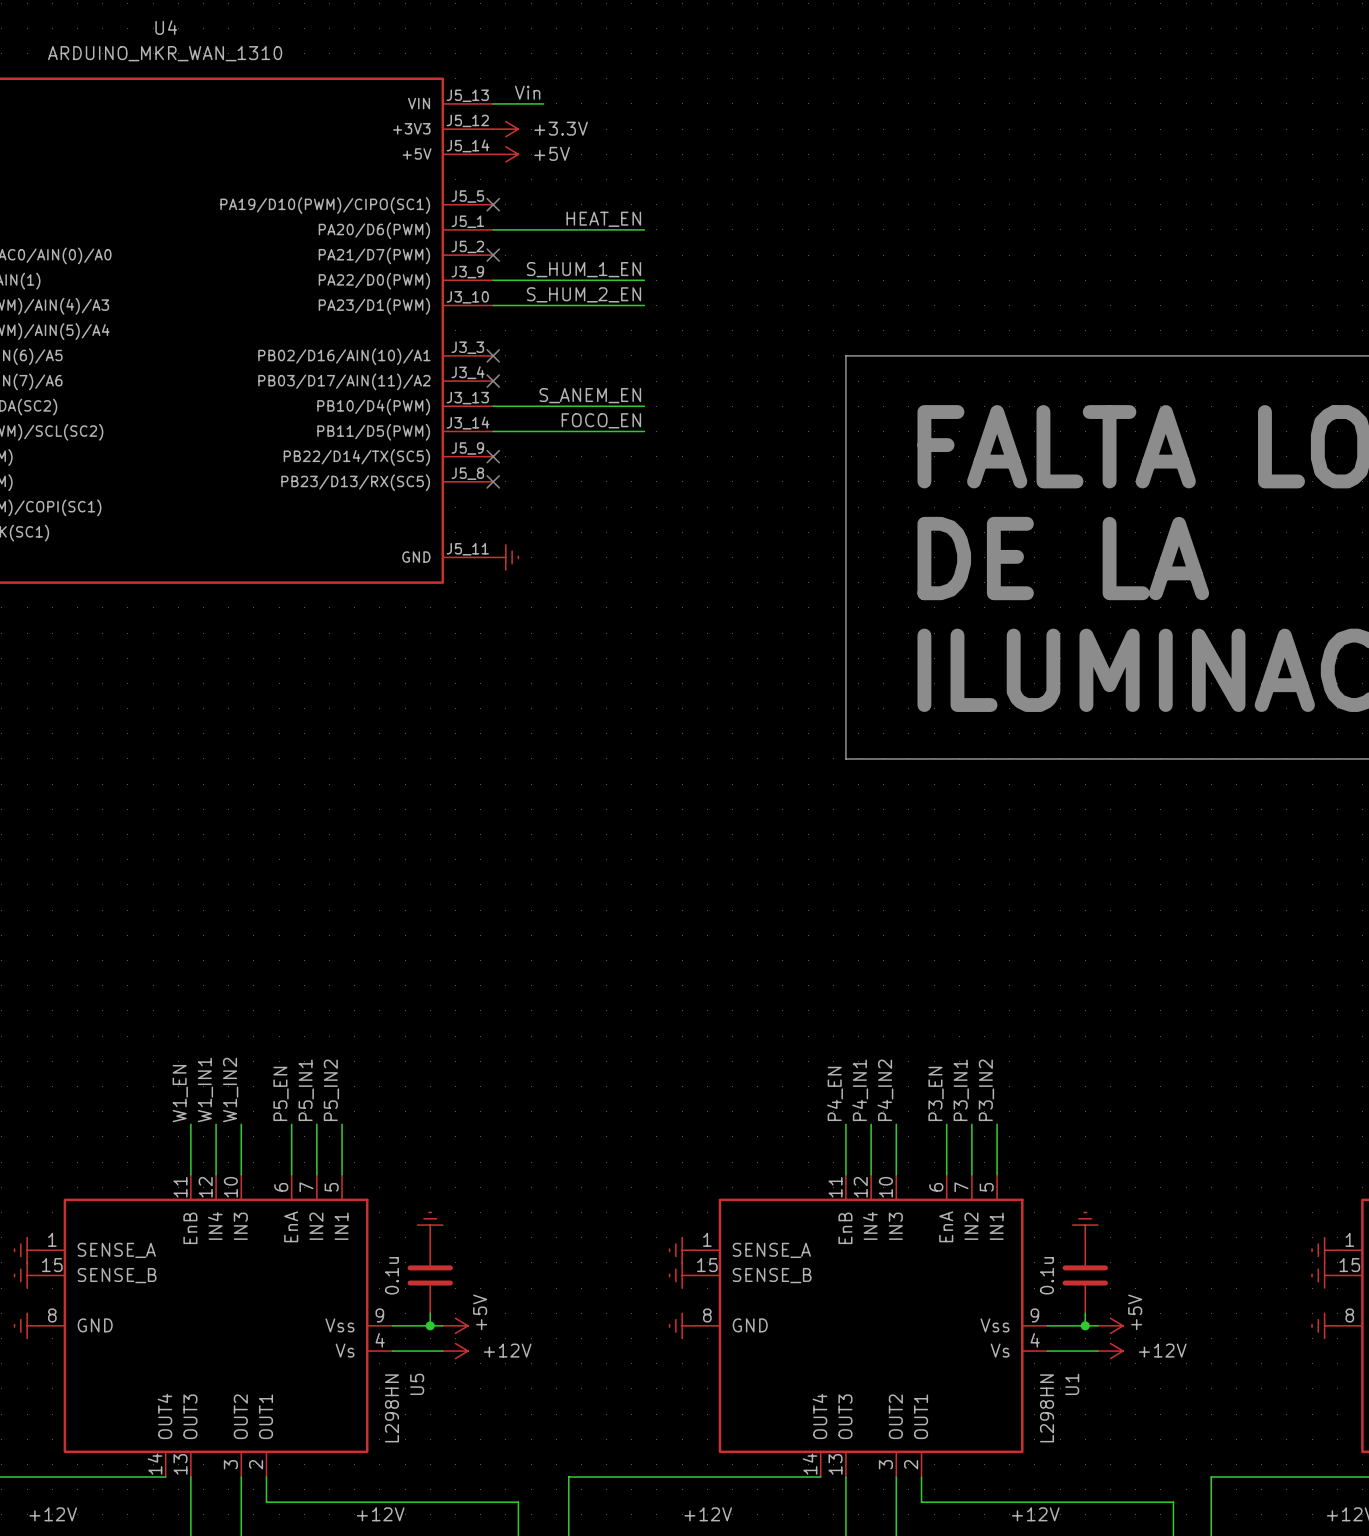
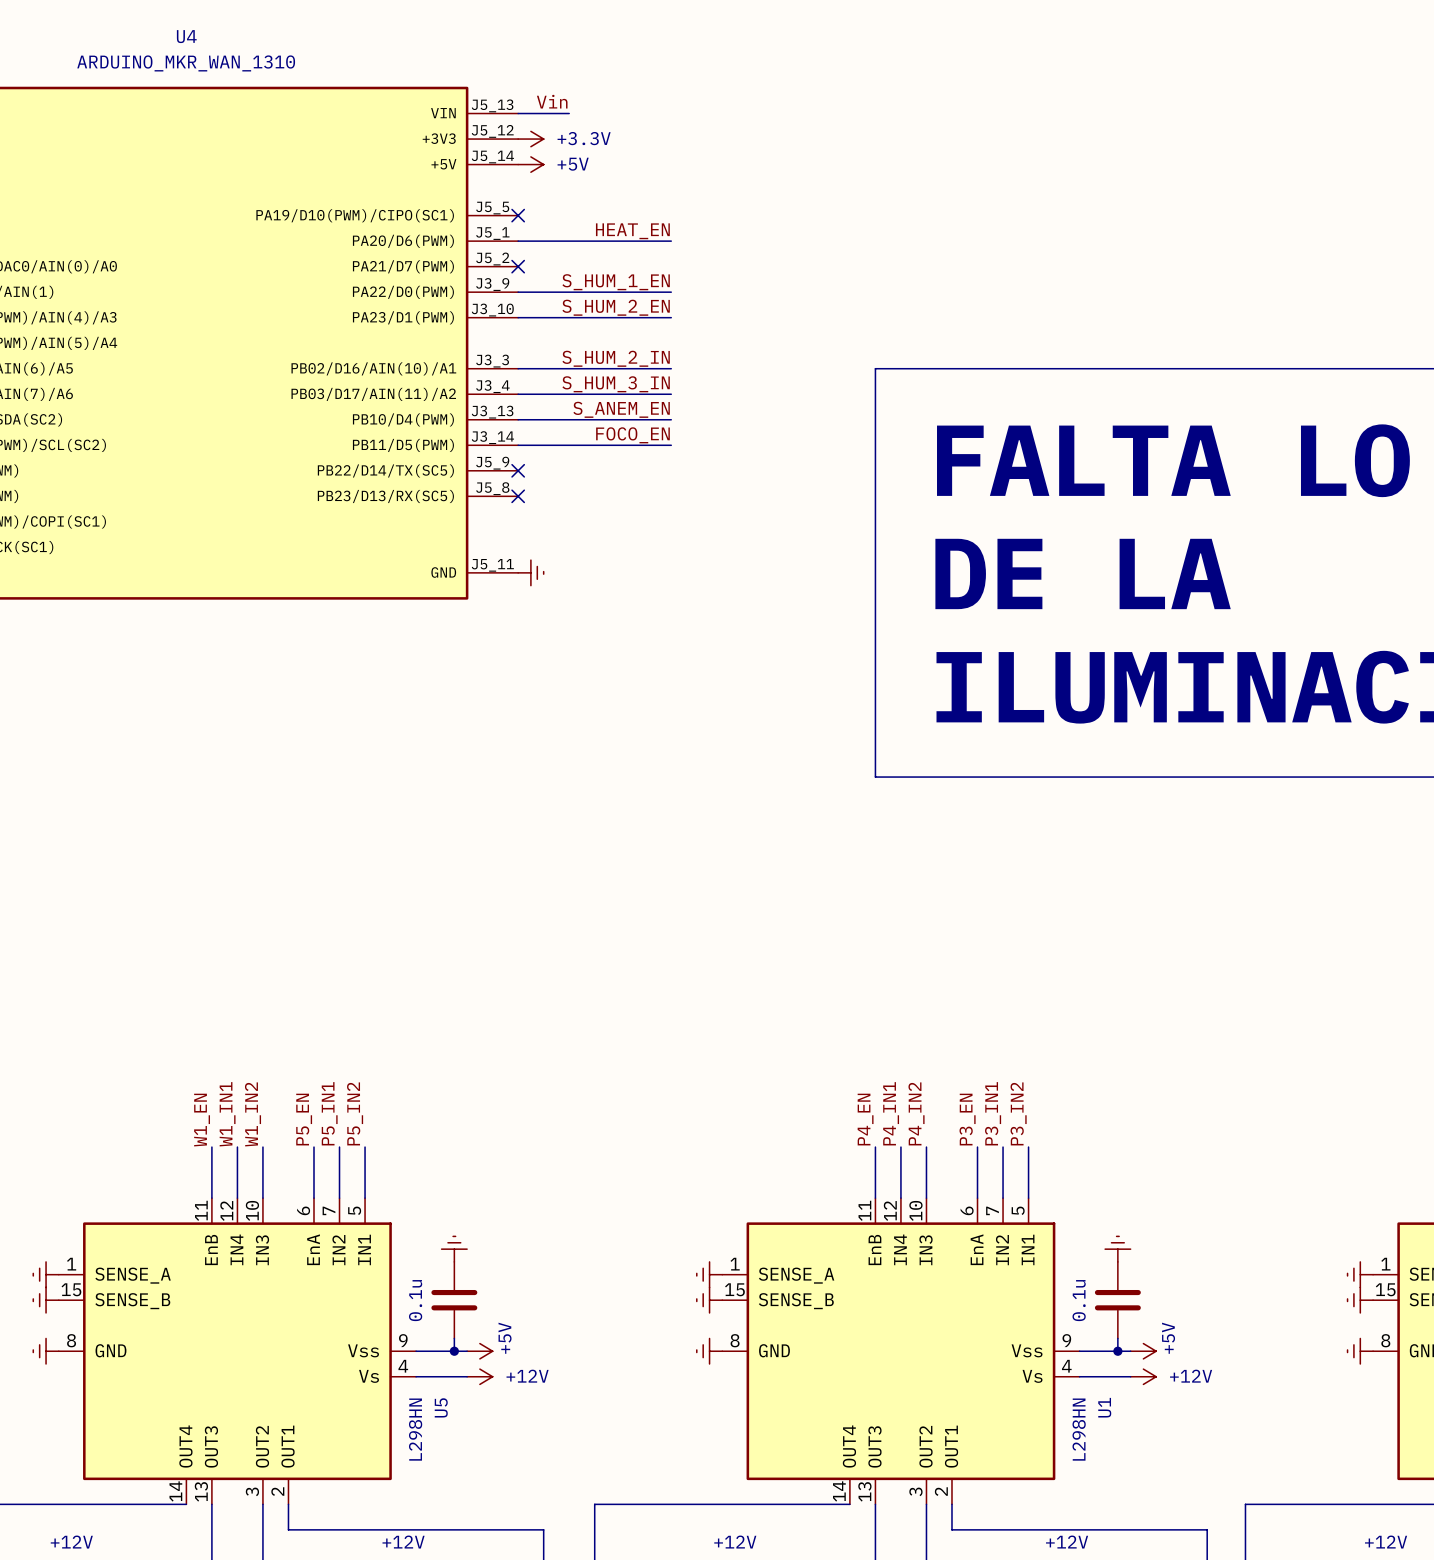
label: none -> S_HUM_2_IN (616, 358)
wire: none -> (518, 368) (671, 368)
no-connect mark: (493, 355) -> none
label: none -> S_HUM_3_IN (616, 384)
wire: none -> (518, 394) (671, 394)
no-connect mark: (493, 381) -> none

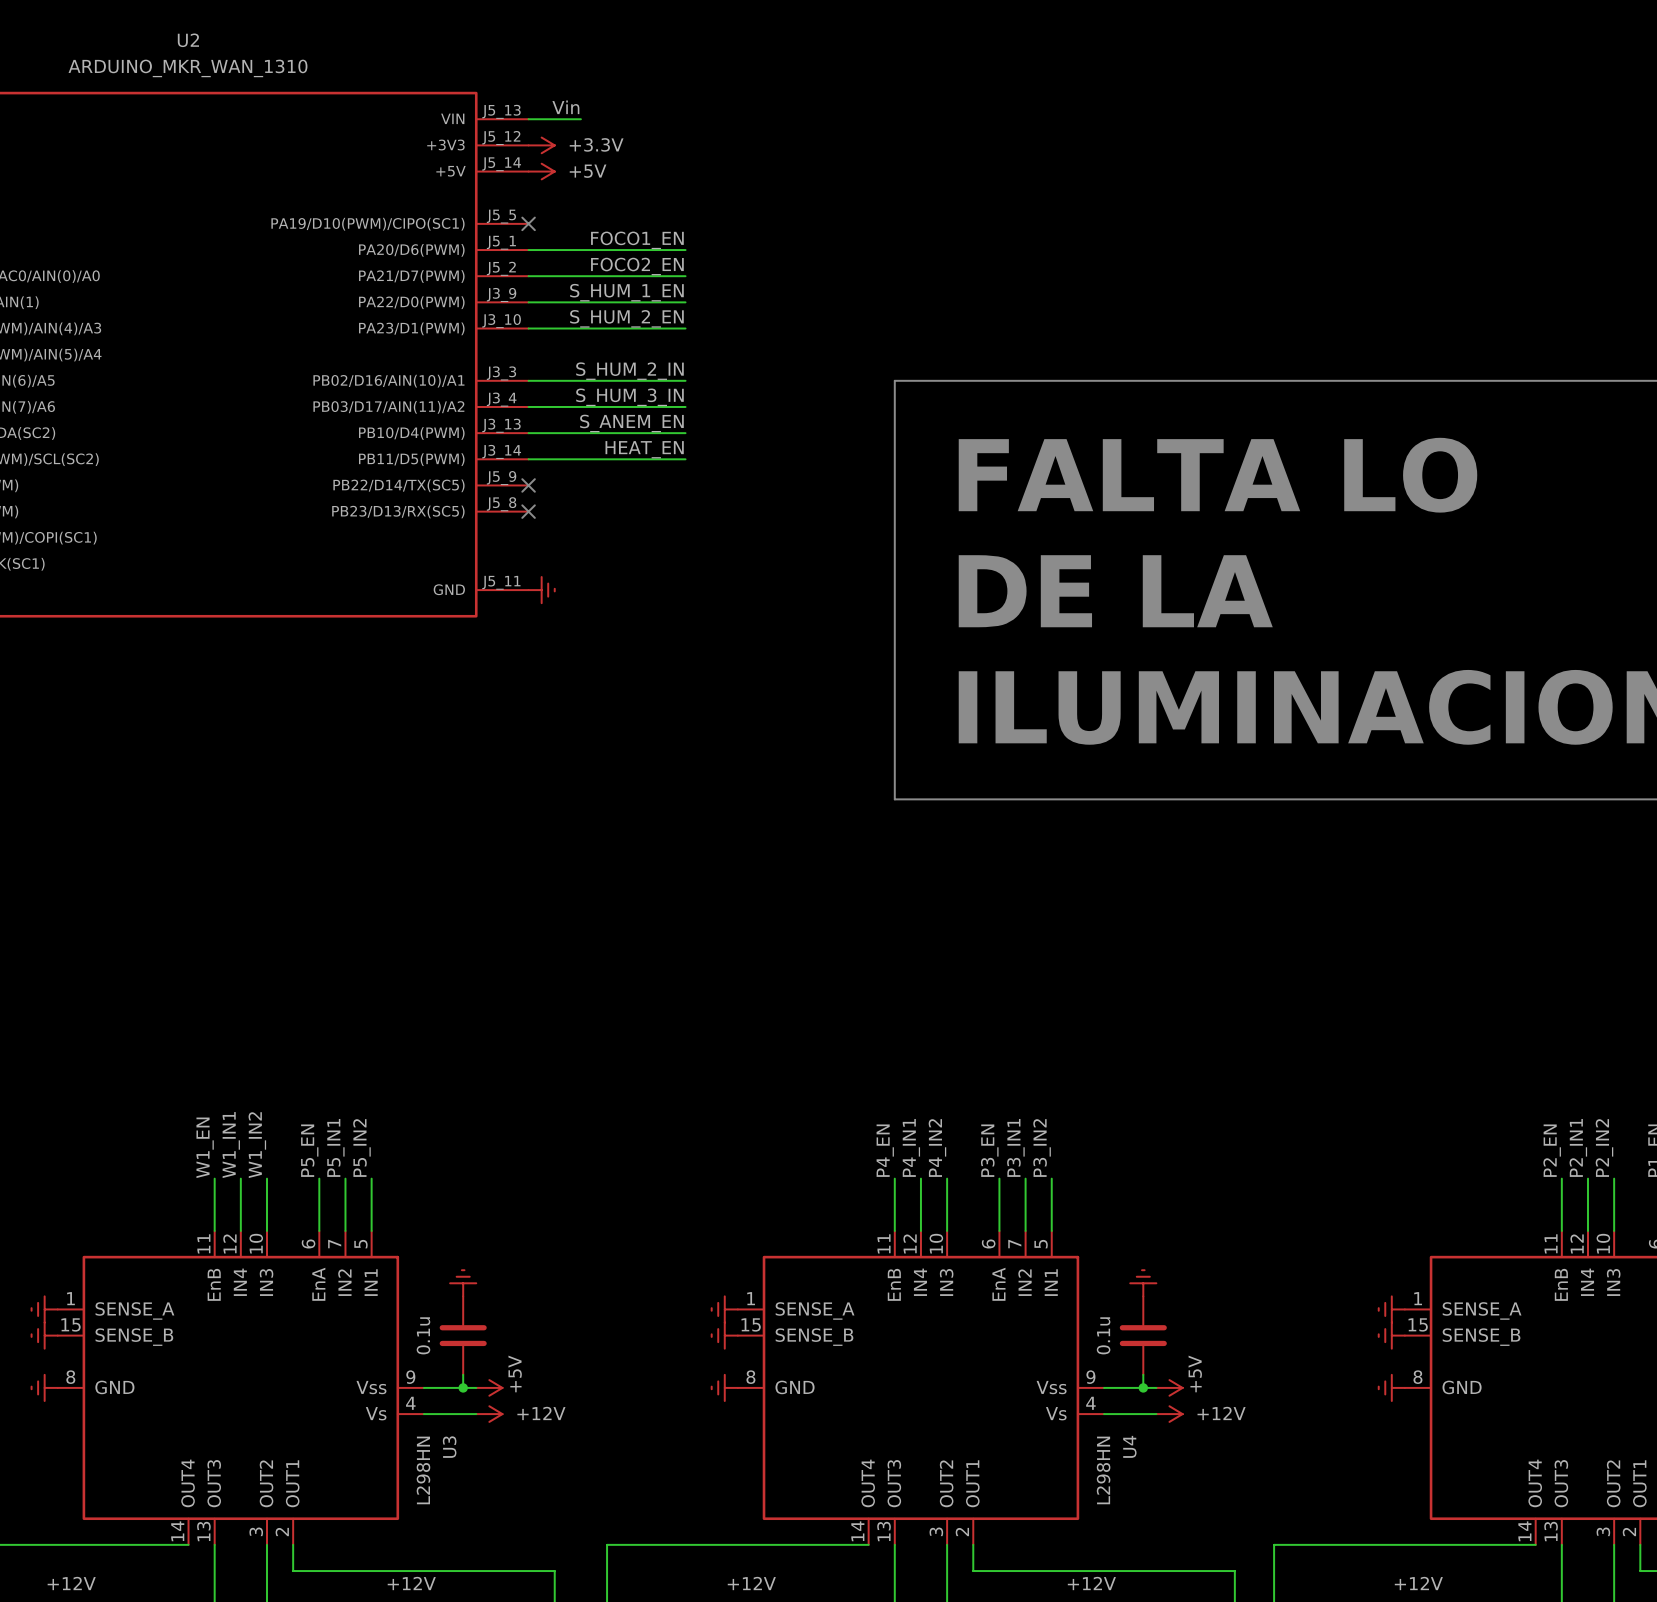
U4 name: U4 (186, 36) -> U2 (188, 40)
label: HEAT_EN (632, 231) -> FOCO1_EN (637, 240)
label: none -> FOCO2_EN (637, 266)
wire: none -> (528, 276) (685, 276)
no-connect mark: (518, 266) -> none
label: FOCO_EN (632, 435) -> HEAT_EN (644, 449)
U5 name: U5 (441, 1407) -> U3 (449, 1447)
U1 name: U1 (1104, 1407) -> U4 (1129, 1446)

